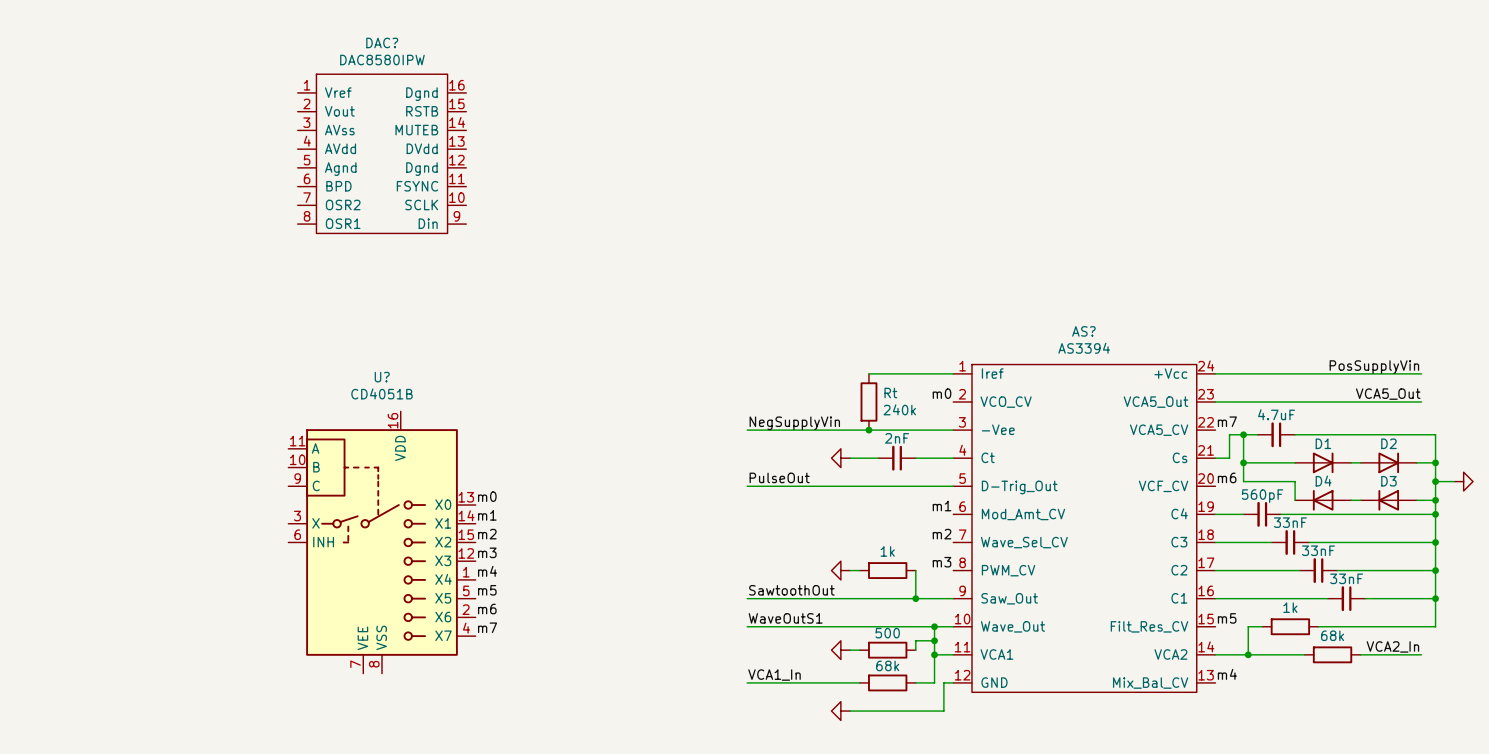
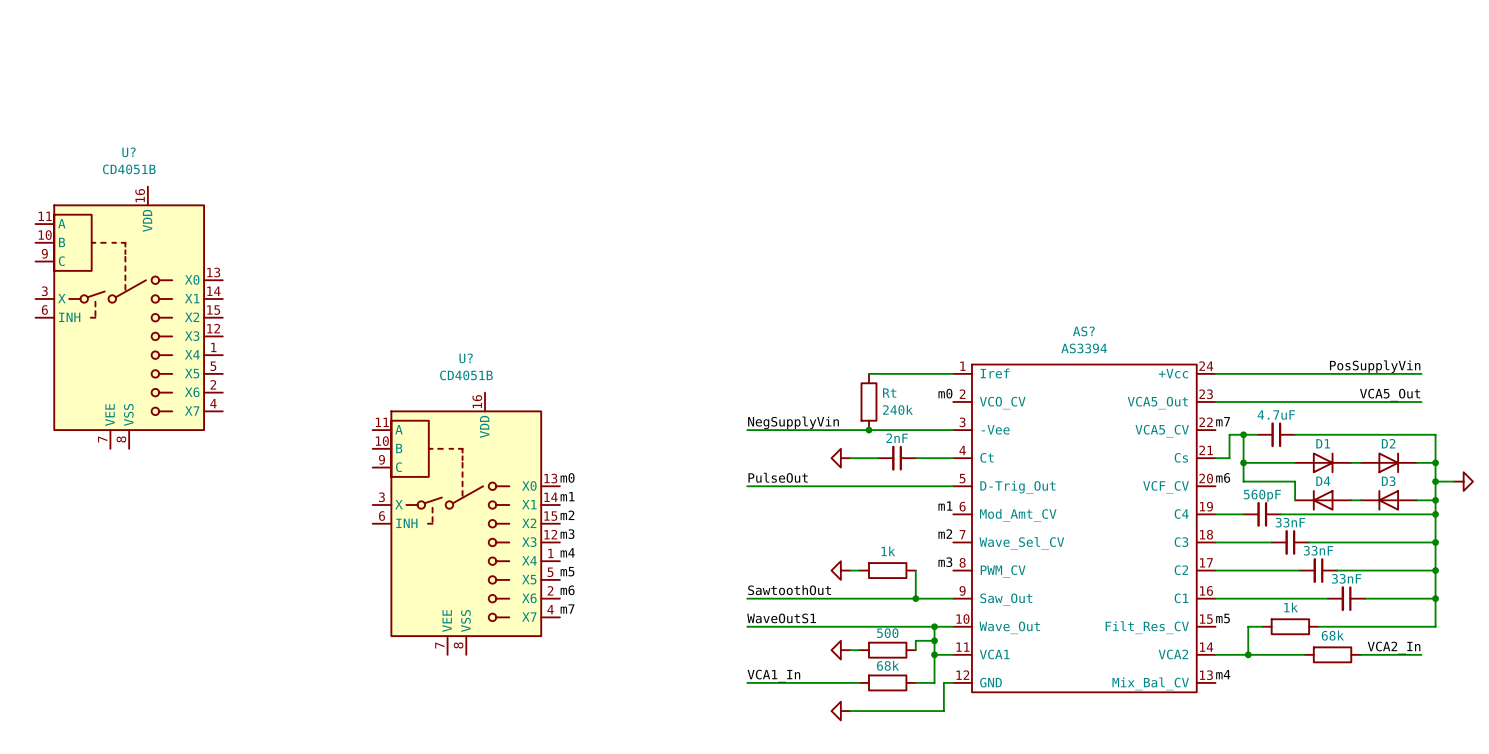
DAC?: DAC8580IPW (382, 153) -> none
U?: none -> CD4051B (129, 317)
label position: m0 (487, 496) -> m0 (567, 477)
label position: m1 (487, 515) -> m1 (567, 496)
label position: m2 (487, 534) -> m2 (567, 515)
U? position: (382, 542) -> (466, 523)
label position: m3 (487, 552) -> m3 (567, 534)
label position: m4 (487, 571) -> m4 (567, 552)
label position: m5 (487, 590) -> m5 (567, 571)
label position: m6 (487, 609) -> m6 (567, 590)
label position: m7 (487, 627) -> m7 (567, 609)

